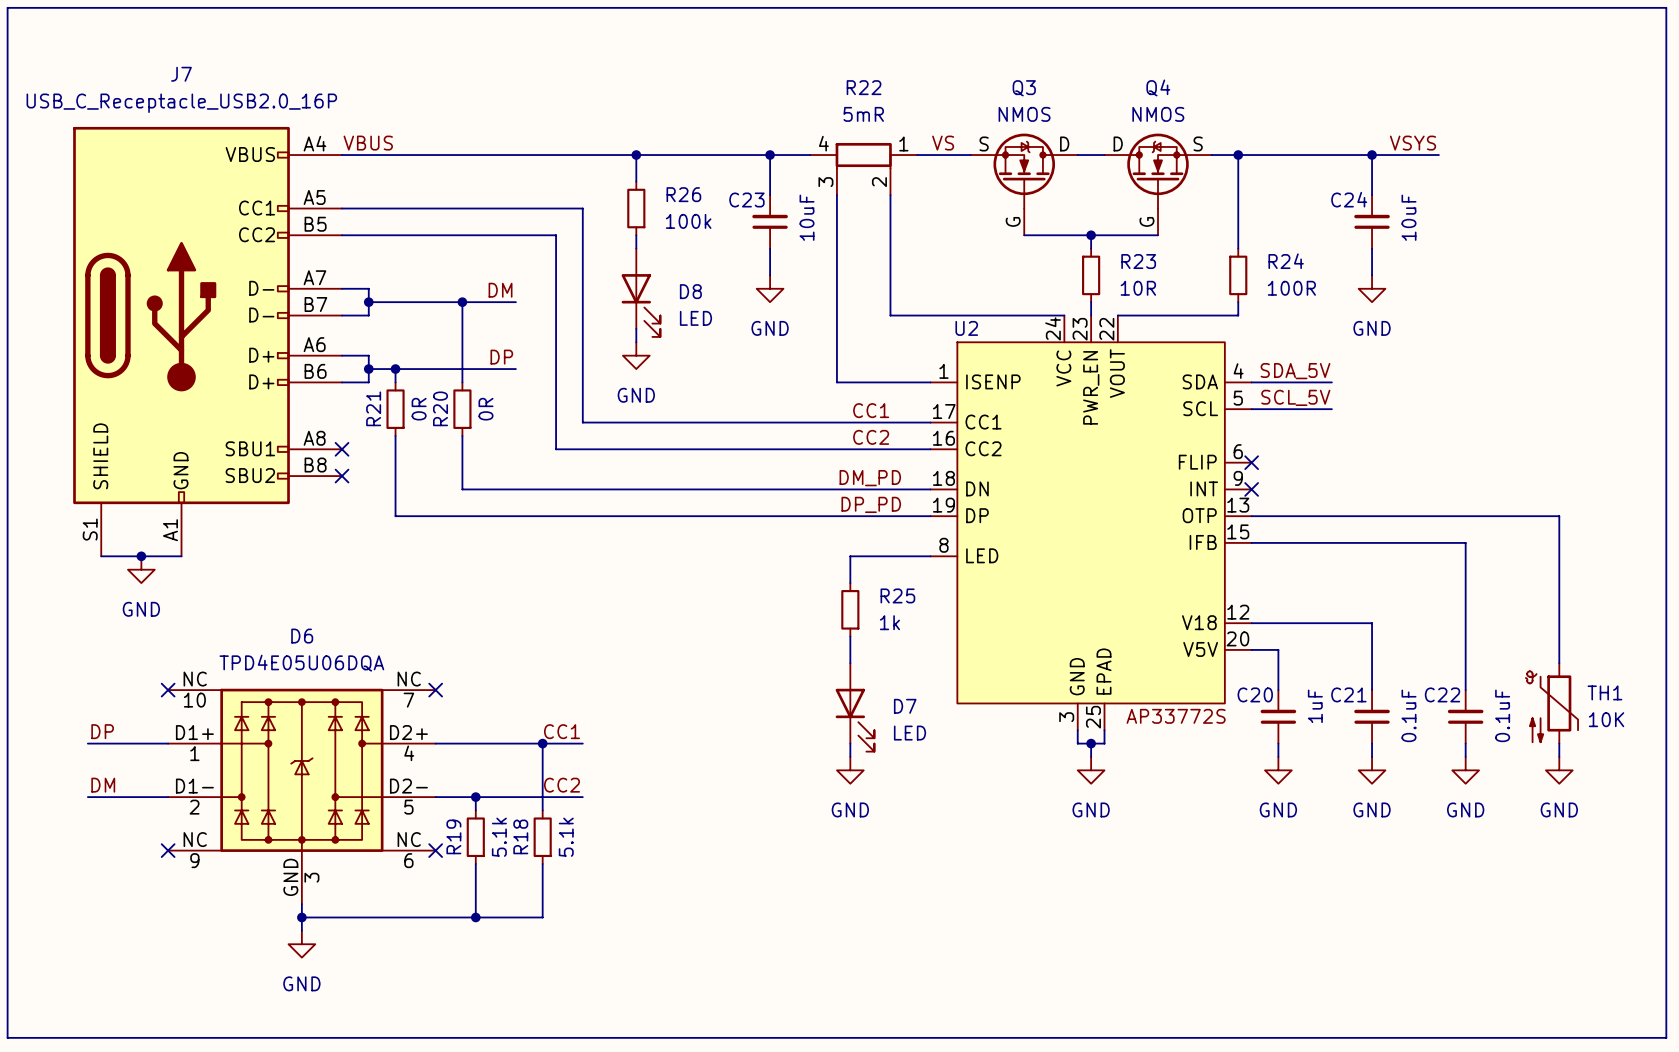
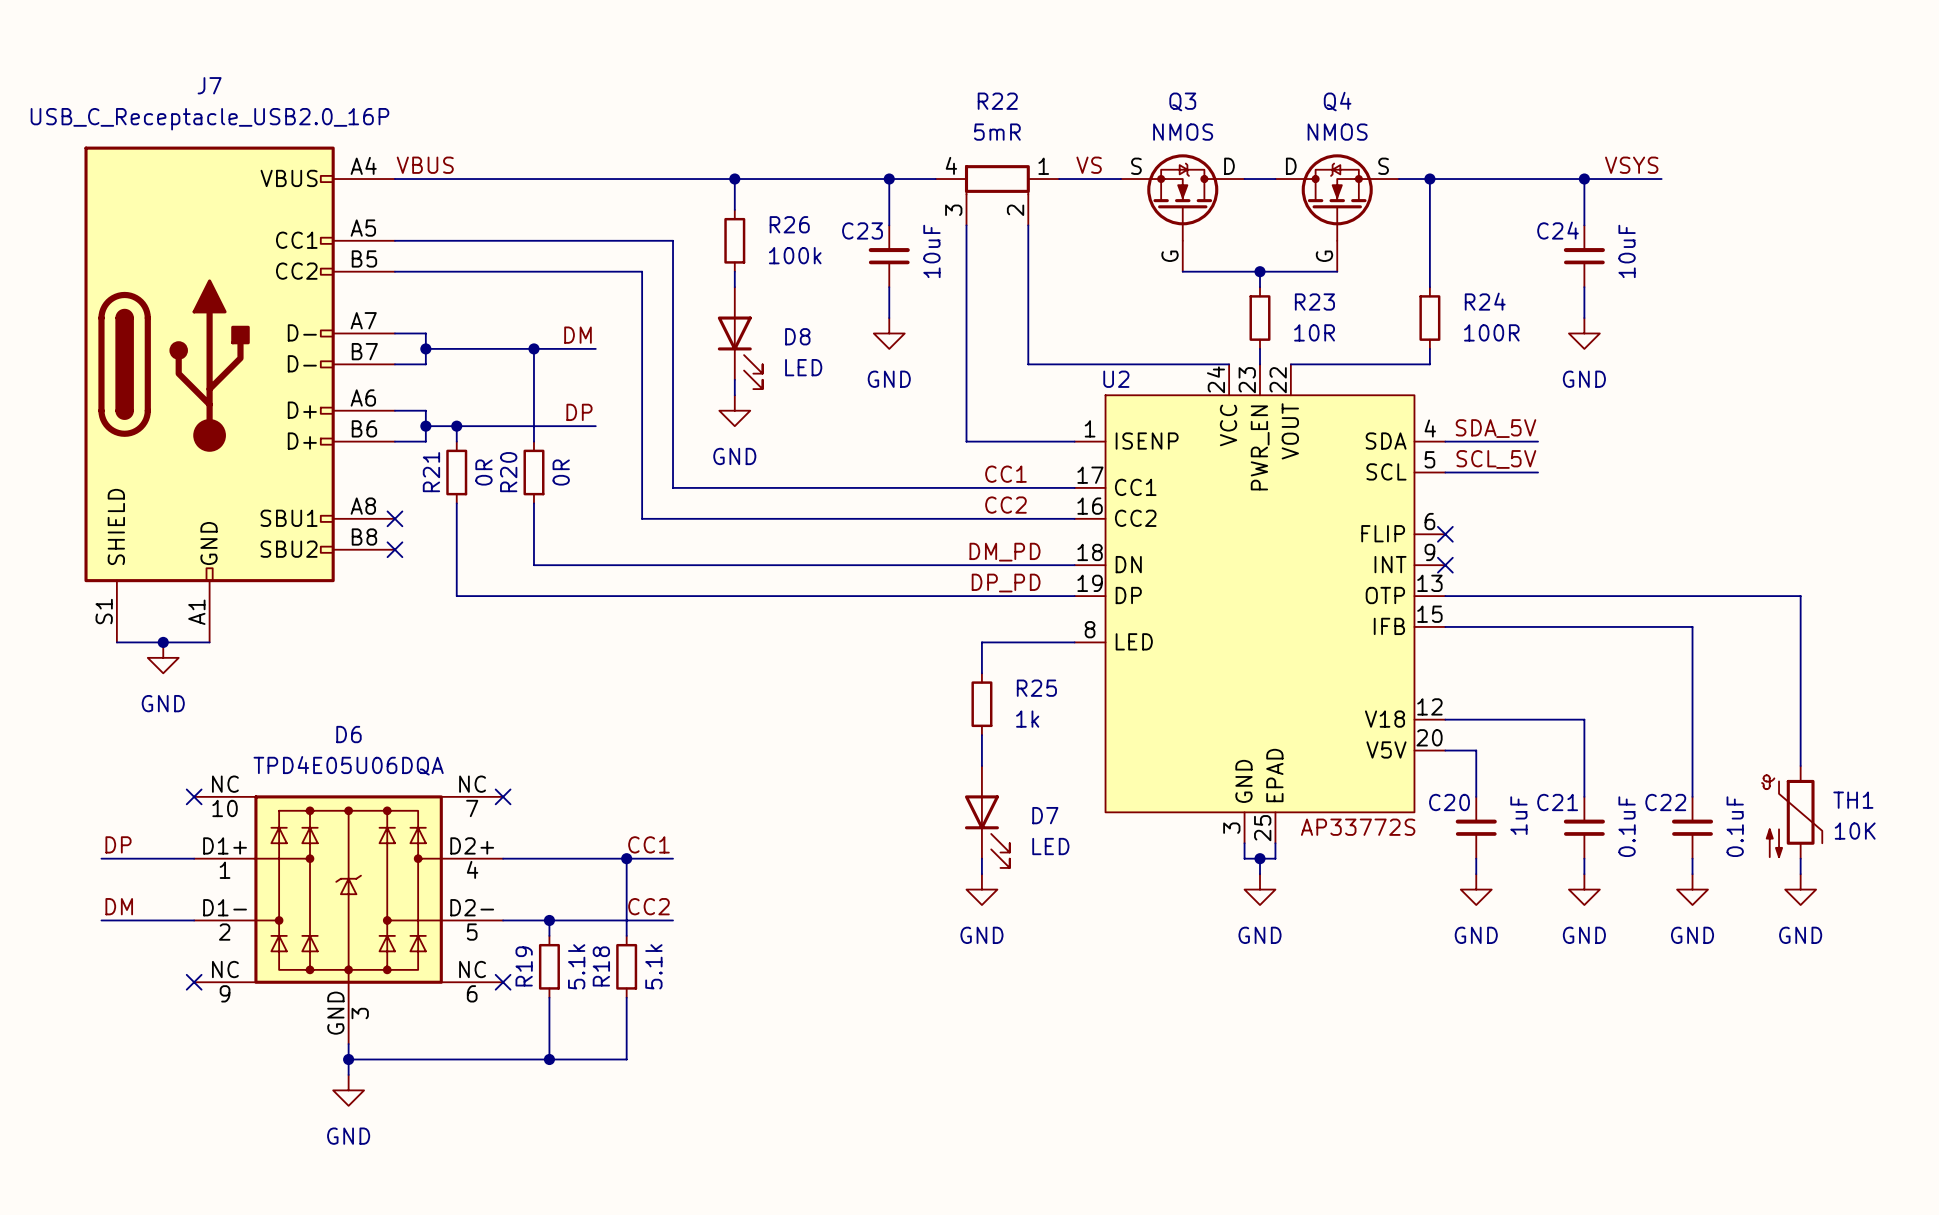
line: (7, 7) (1666, 7) (1666, 1037) (7, 1037) (7, 7) -> none

